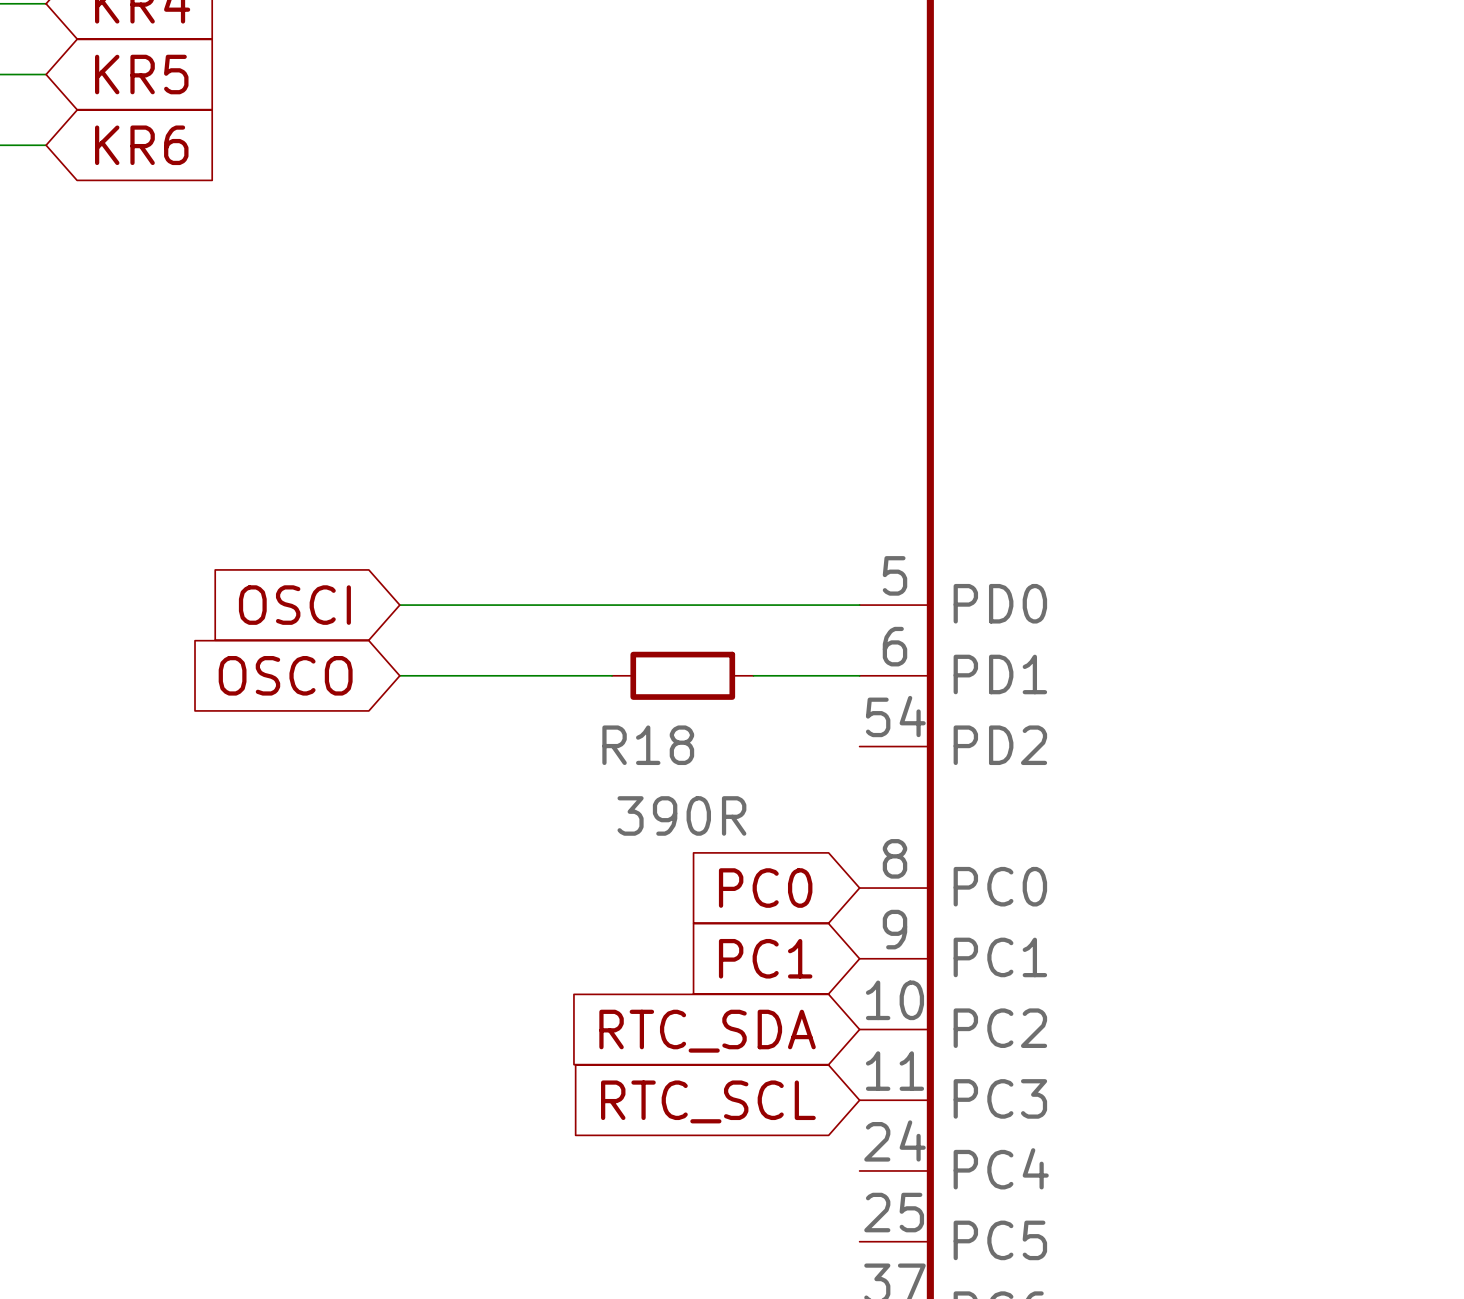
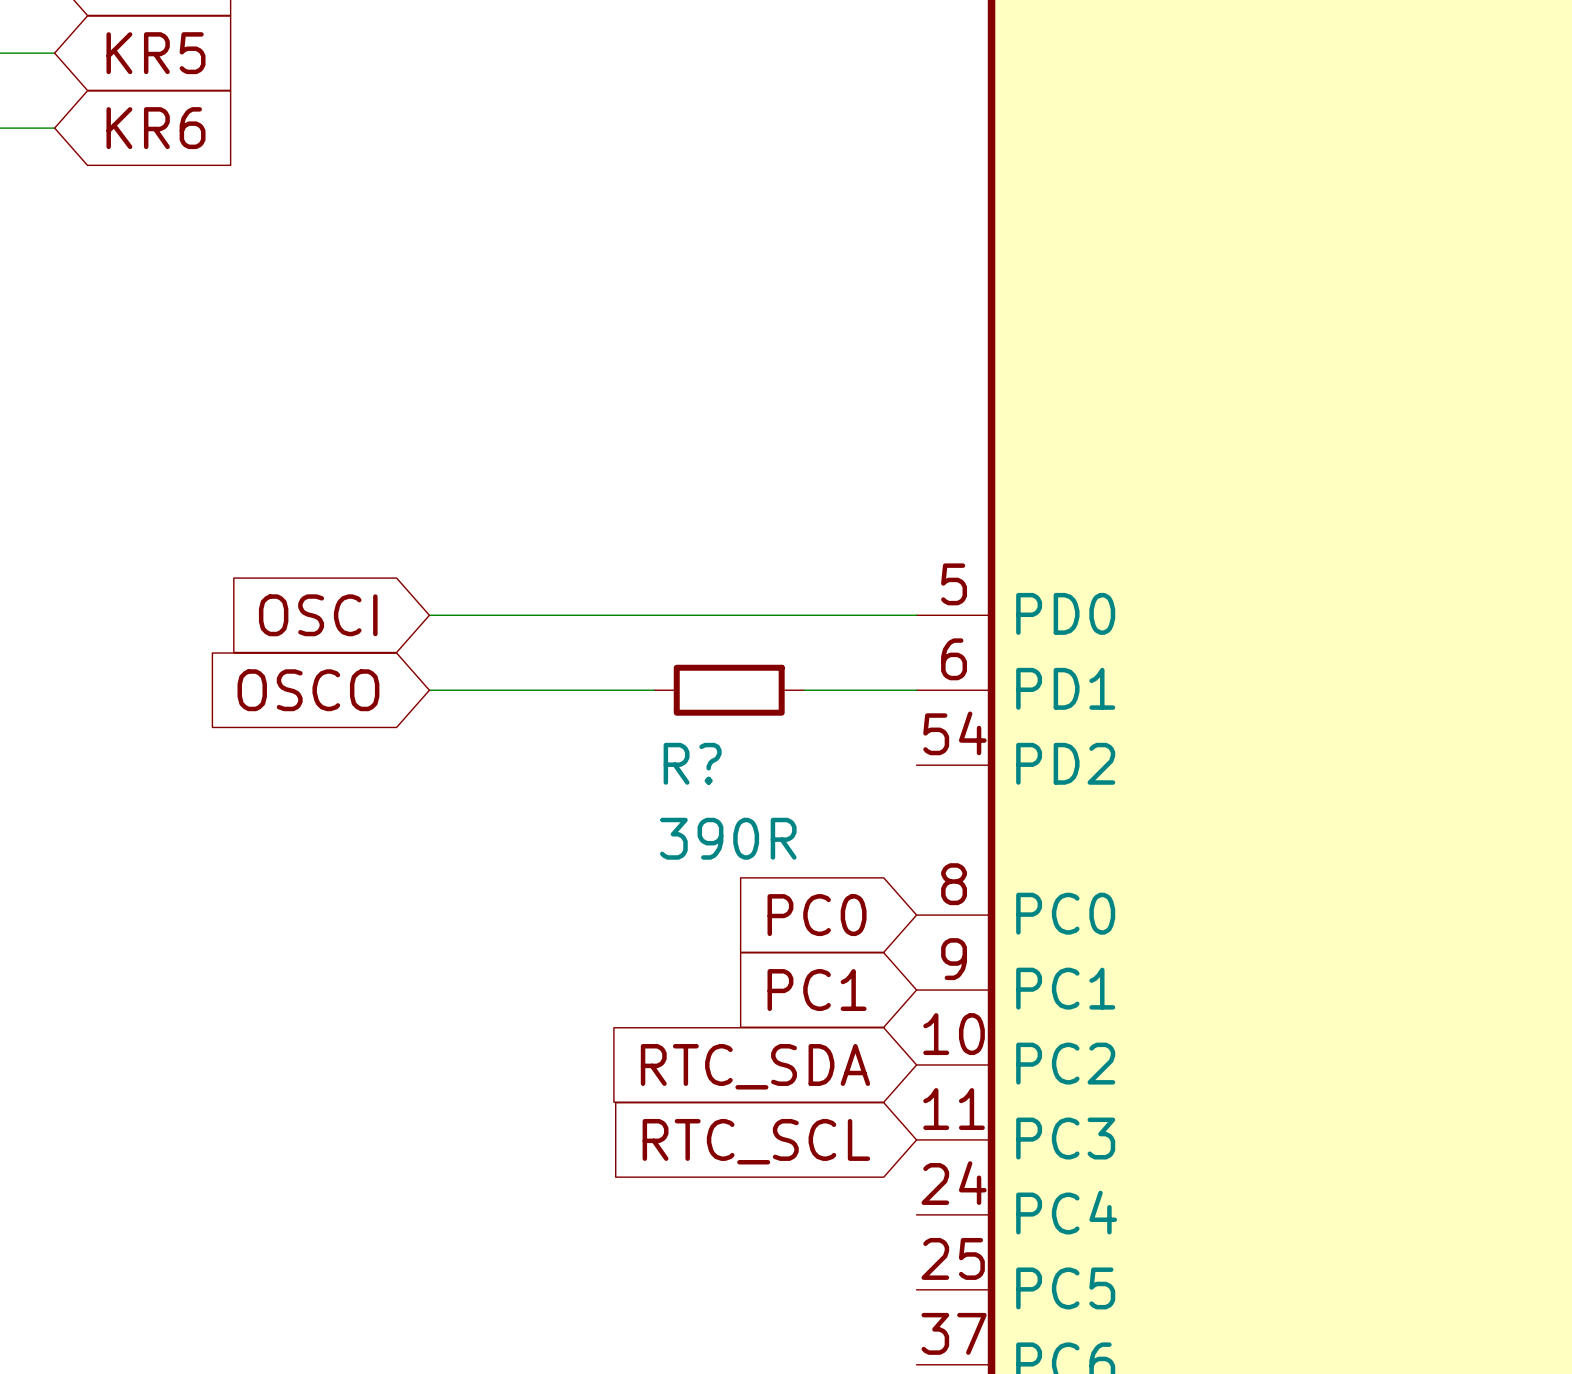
R18 name: R18 (648, 745) -> R? (692, 763)

